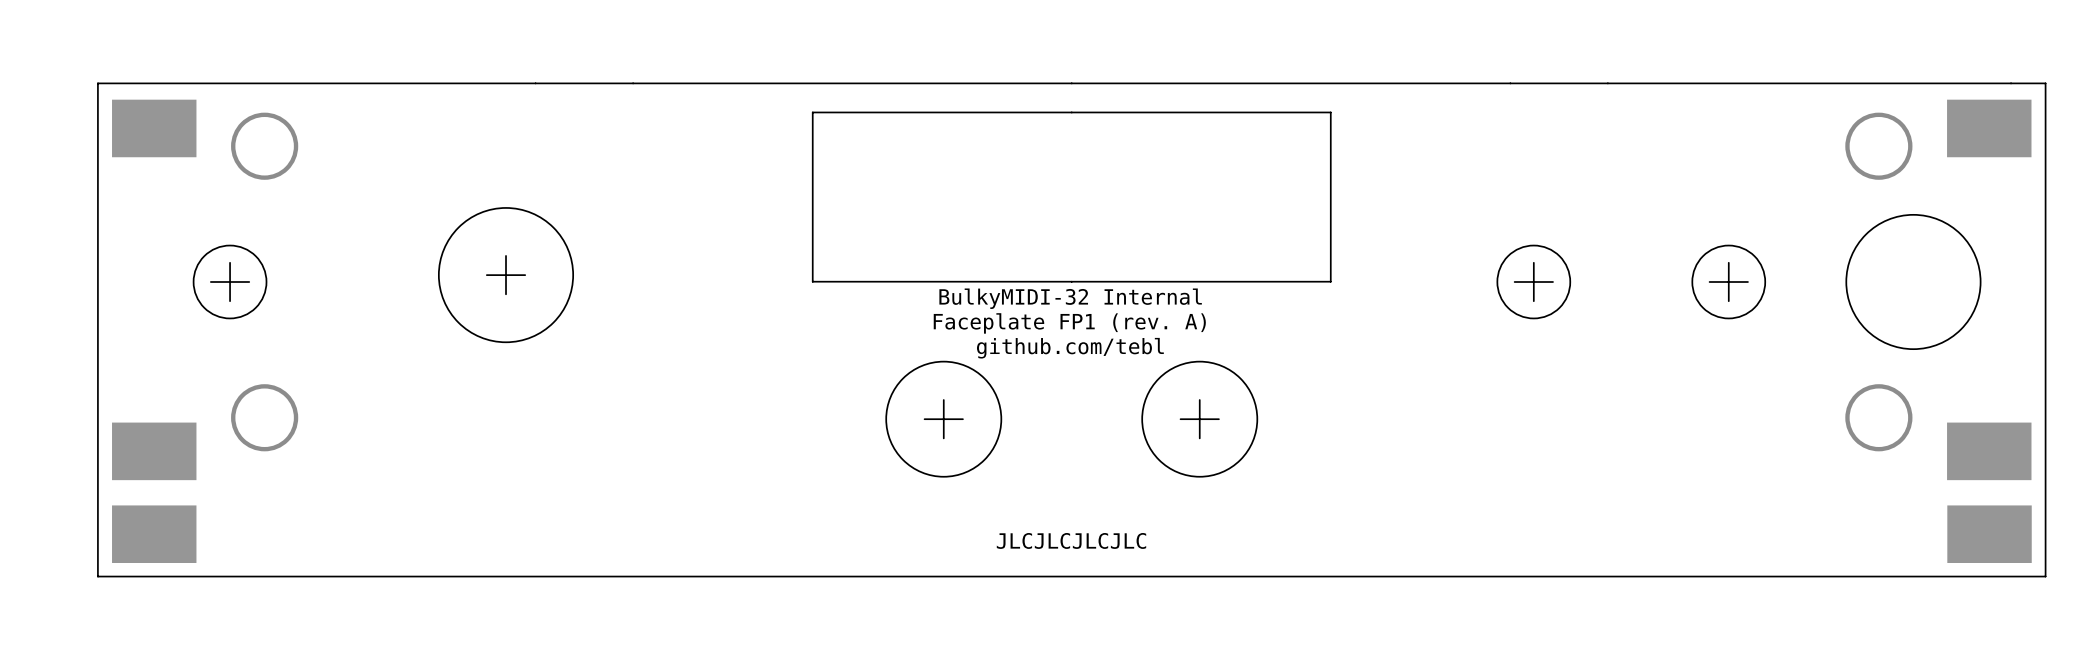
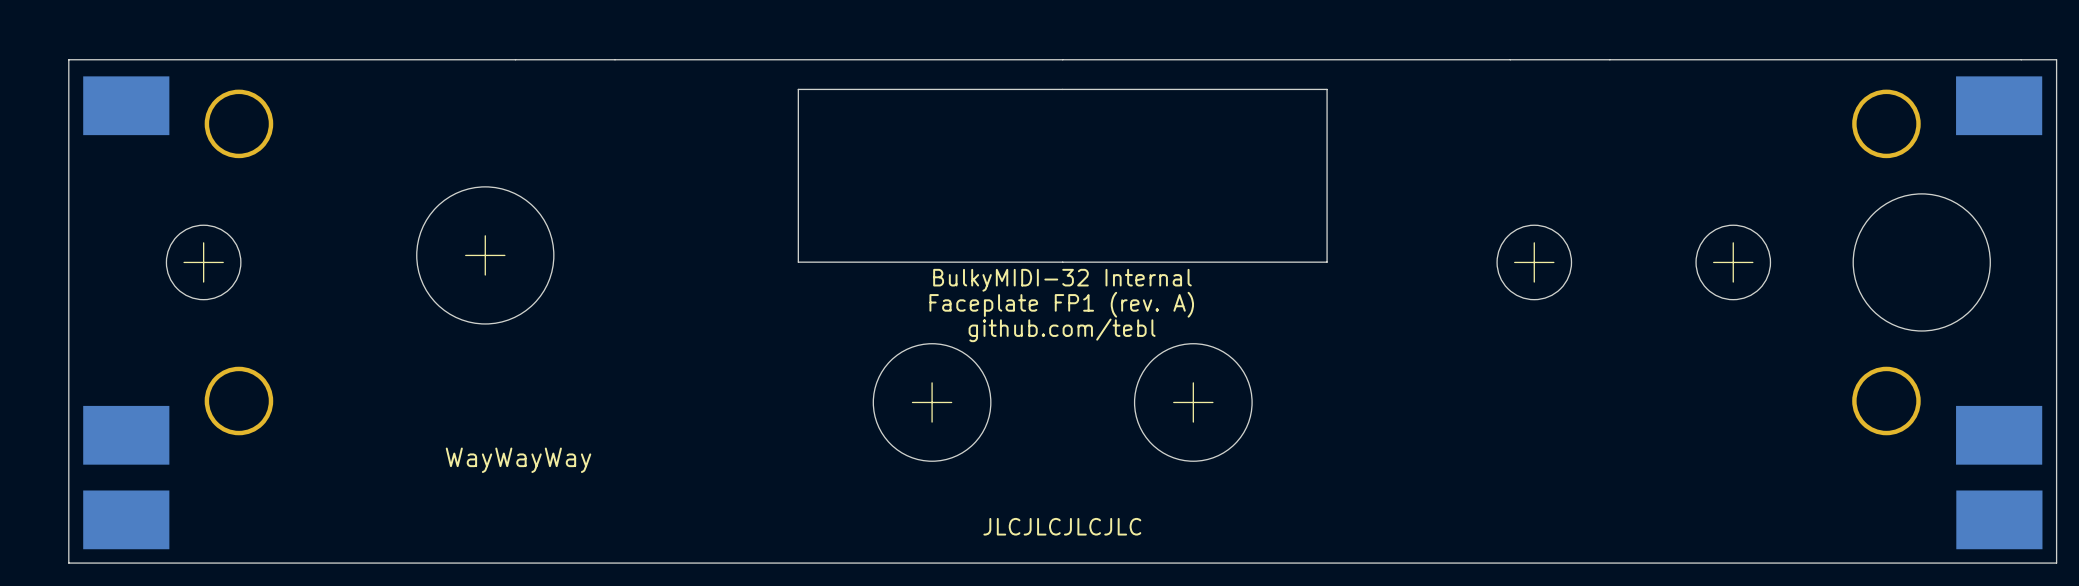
text: none -> WayWayWay (518, 460)

